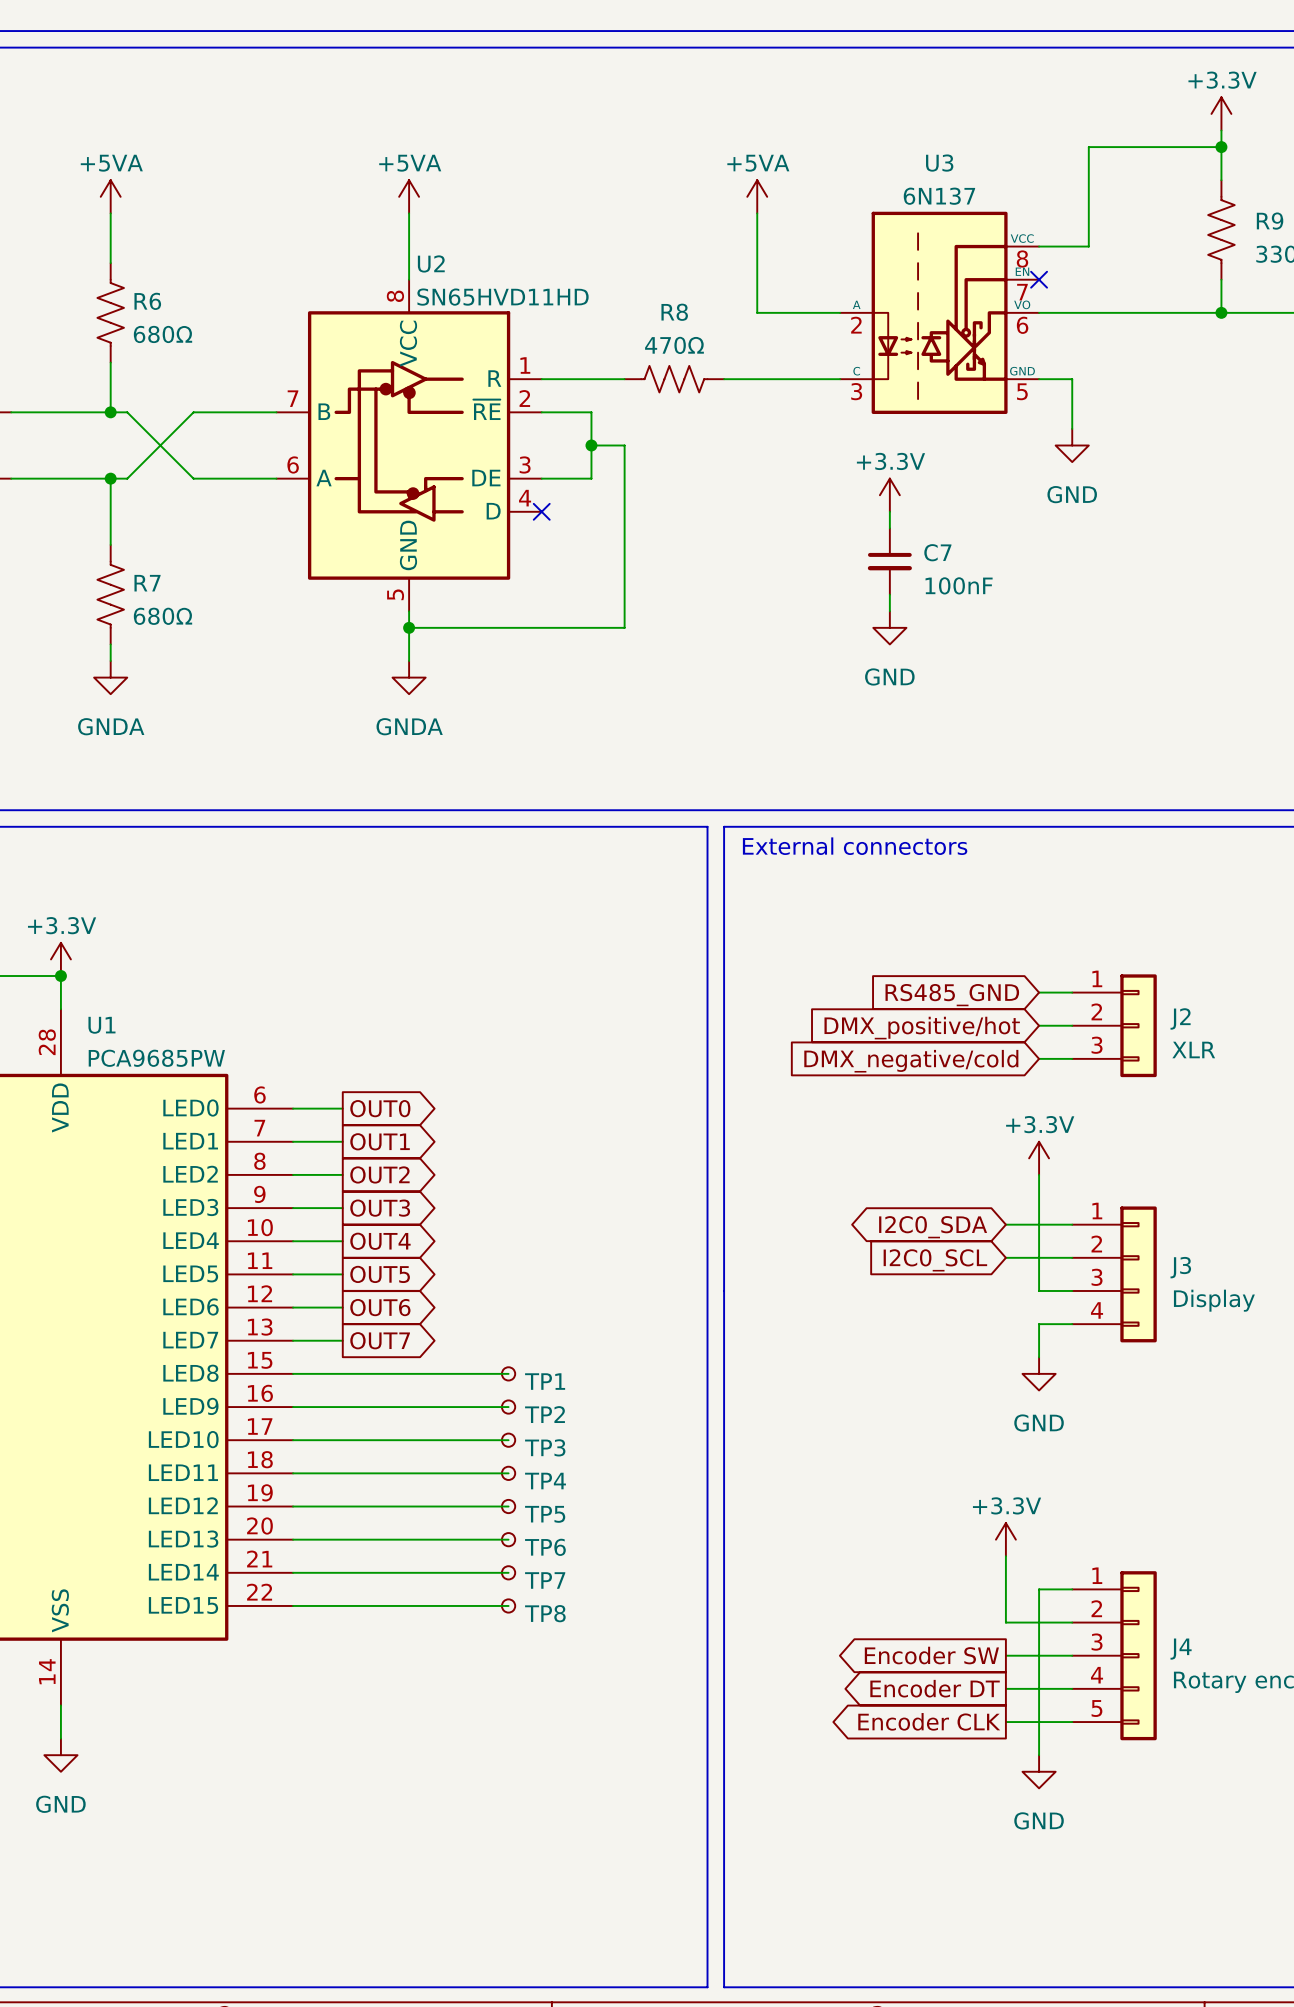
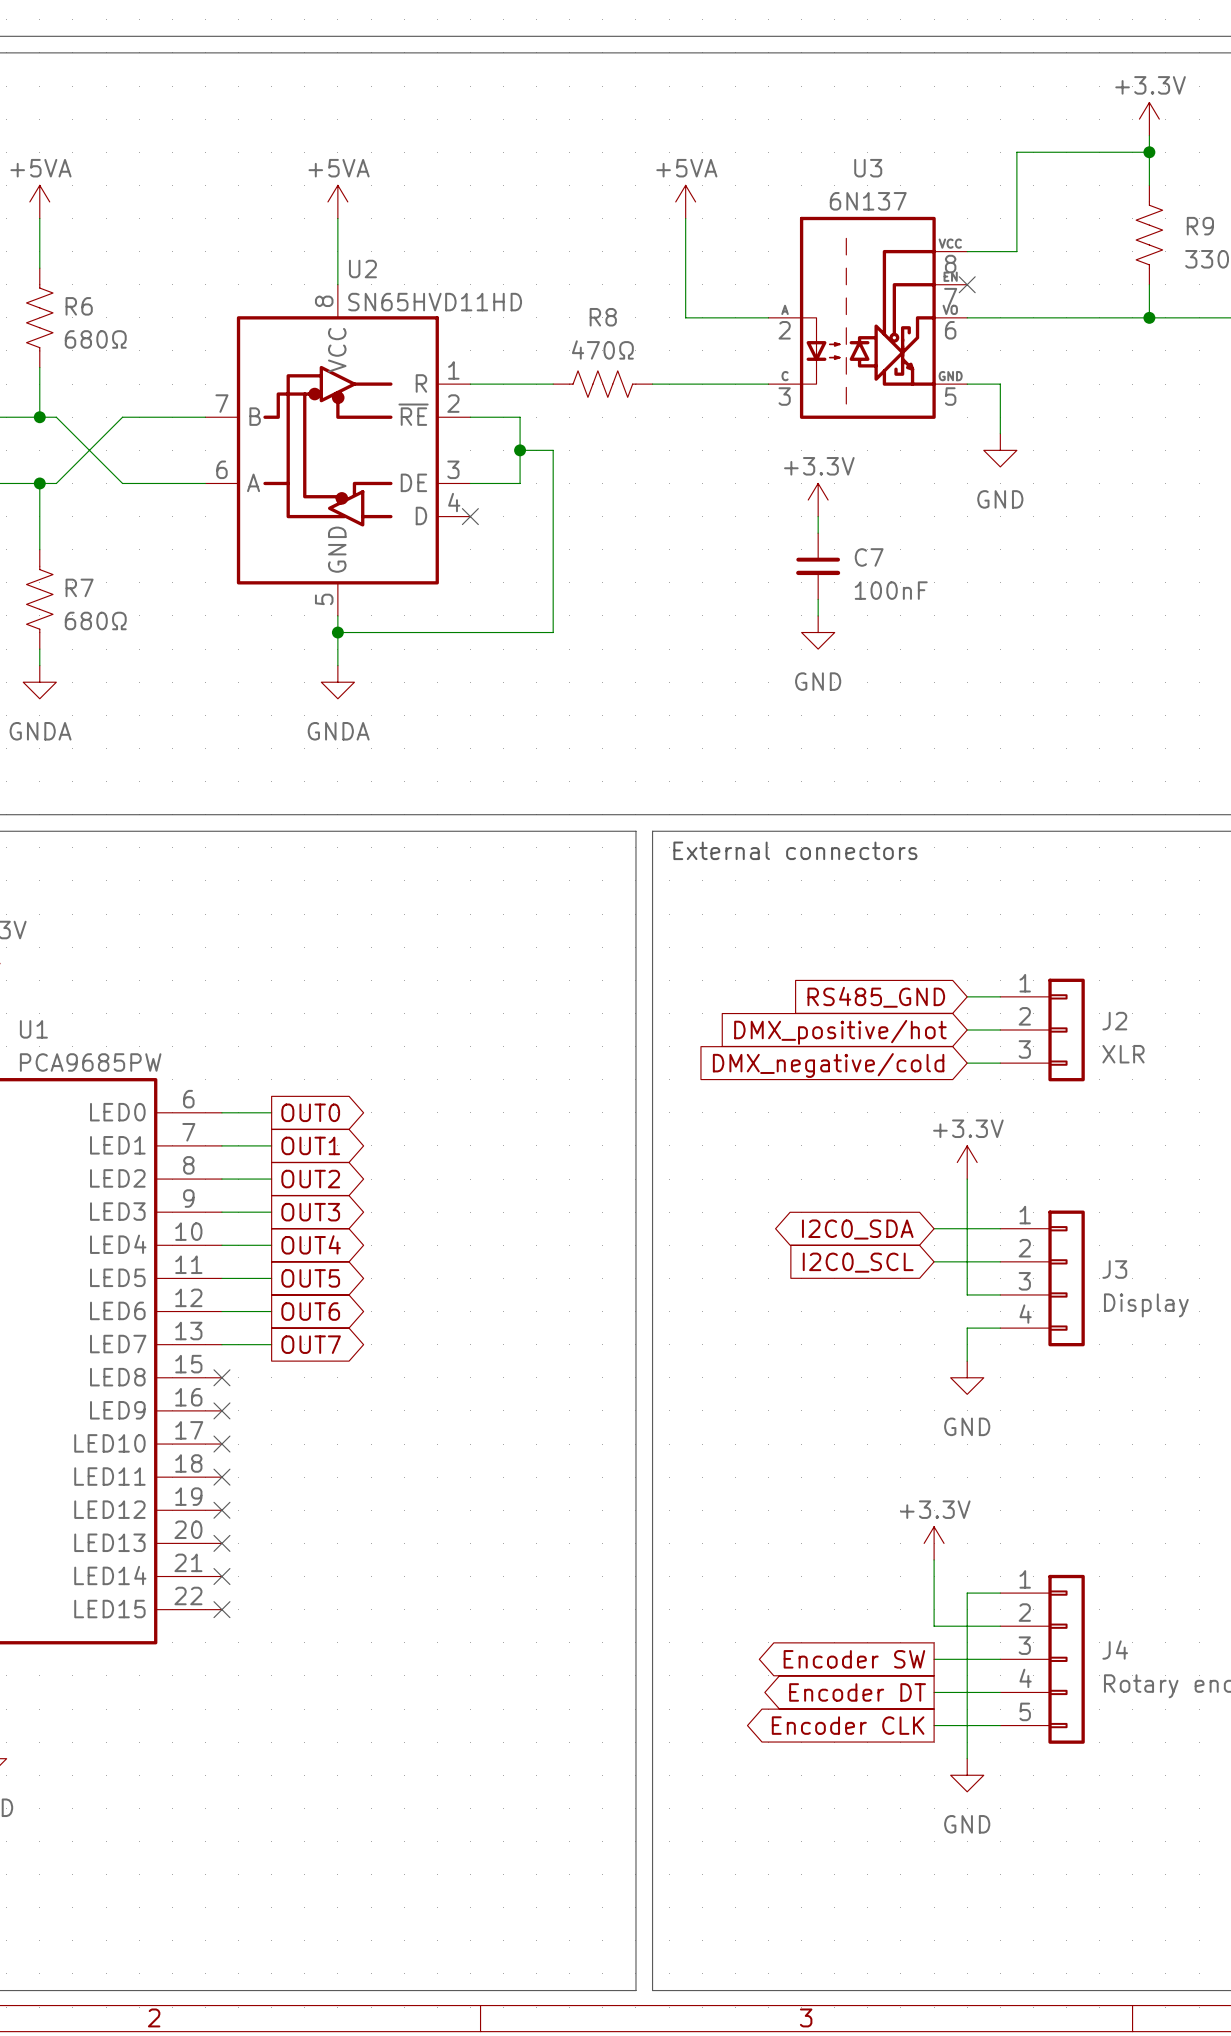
wire: (293, 1373) (508, 1373) -> none
no-connect mark: none -> (221, 1377)
TP1: (508, 1373) -> none
wire: (293, 1407) (508, 1407) -> none
no-connect mark: none -> (221, 1410)
TP2: (508, 1407) -> none
wire: (293, 1440) (508, 1440) -> none
no-connect mark: none -> (221, 1444)
TP3: (508, 1440) -> none
wire: (293, 1473) (508, 1473) -> none
no-connect mark: none -> (221, 1477)
TP4: (508, 1473) -> none
wire: (293, 1506) (508, 1506) -> none
no-connect mark: none -> (221, 1510)
TP5: (508, 1506) -> none
wire: (293, 1539) (508, 1539) -> none
no-connect mark: none -> (221, 1543)
TP6: (508, 1539) -> none
wire: (293, 1572) (508, 1572) -> none
no-connect mark: none -> (221, 1576)
TP7: (508, 1572) -> none
wire: (293, 1605) (508, 1605) -> none
no-connect mark: none -> (221, 1609)
TP8: (508, 1605) -> none

